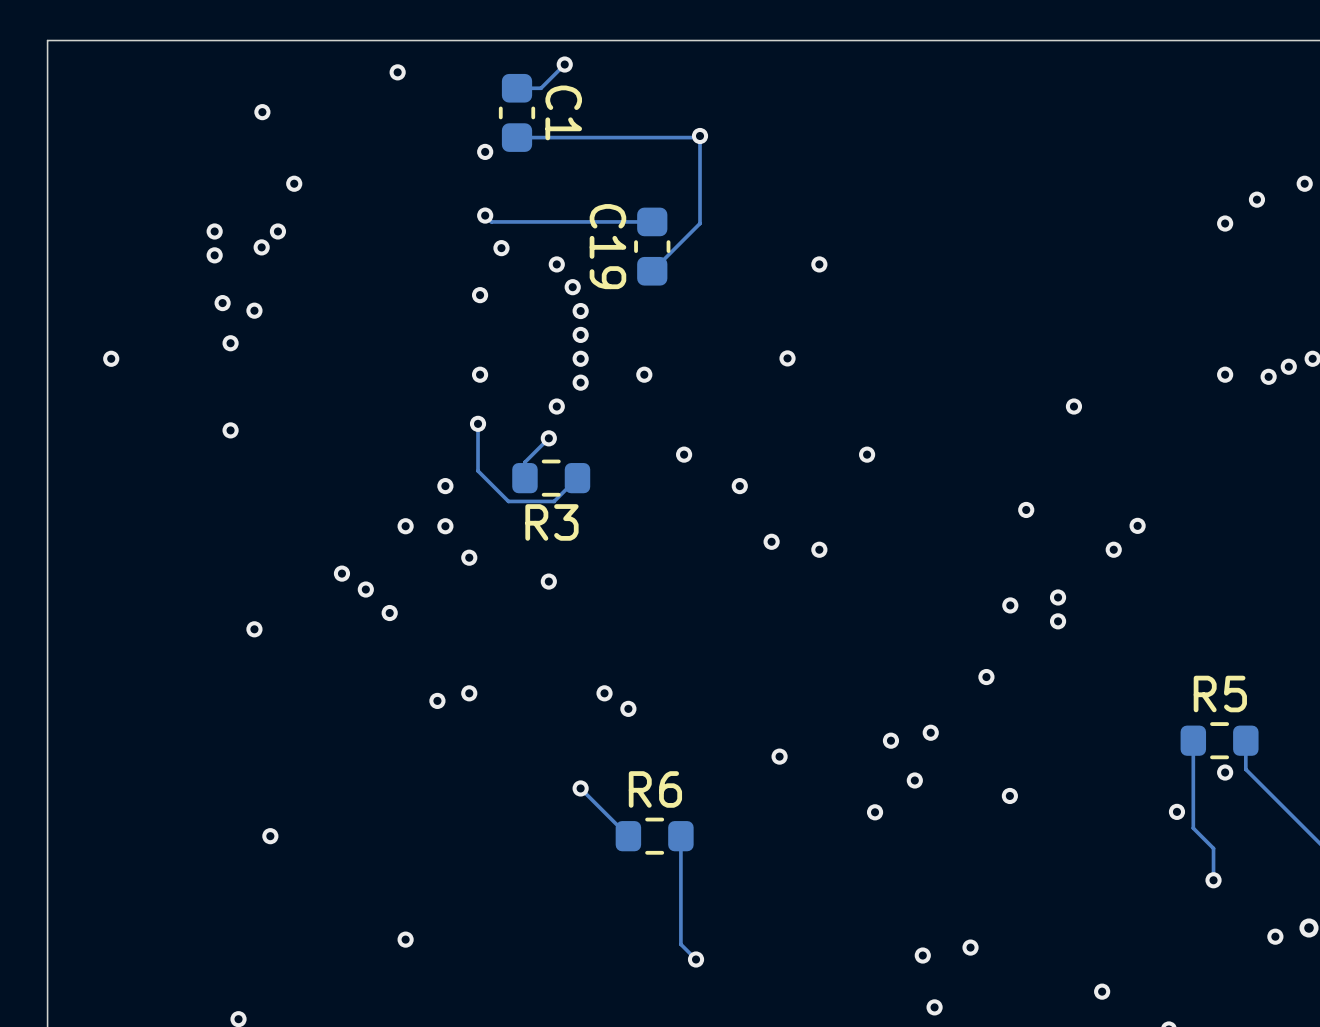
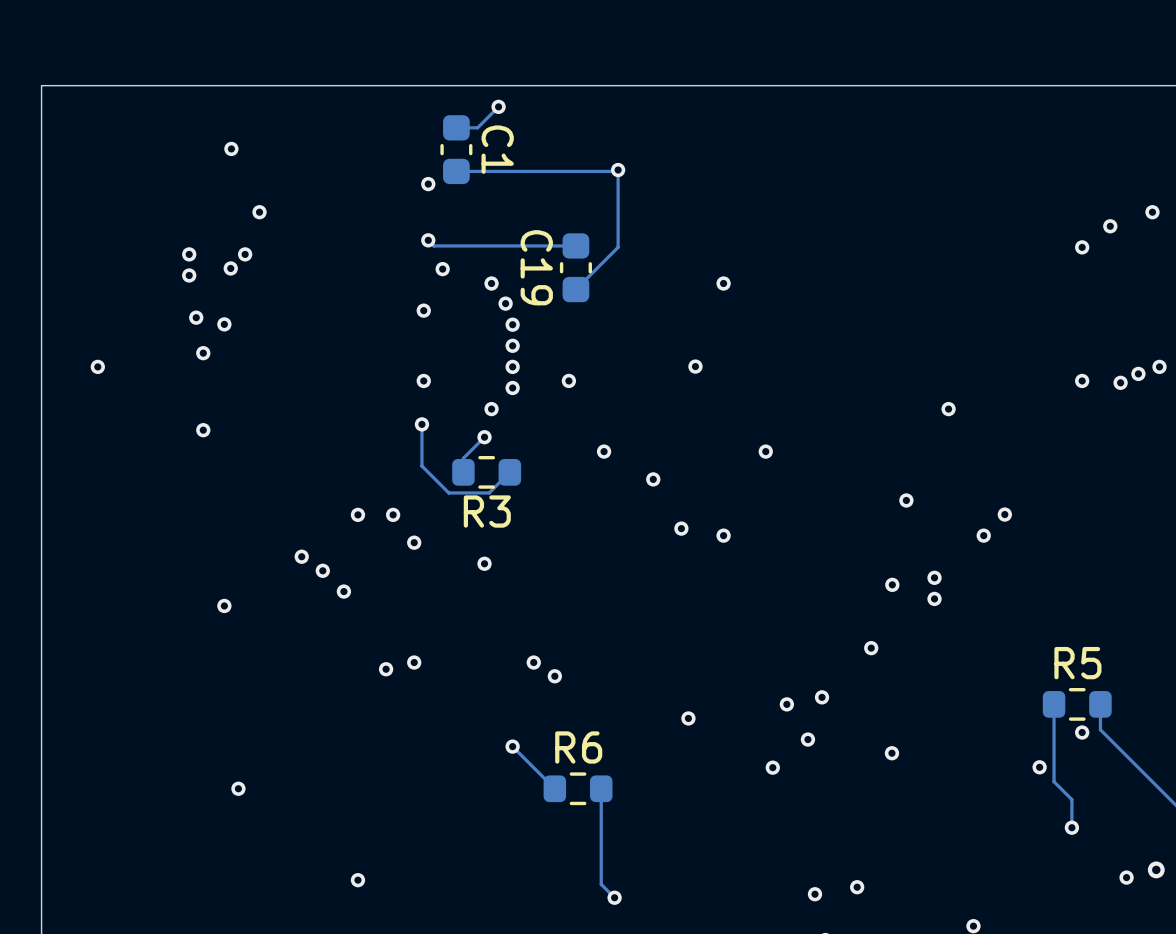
via: (397, 72) -> none
via: (445, 486) -> none

